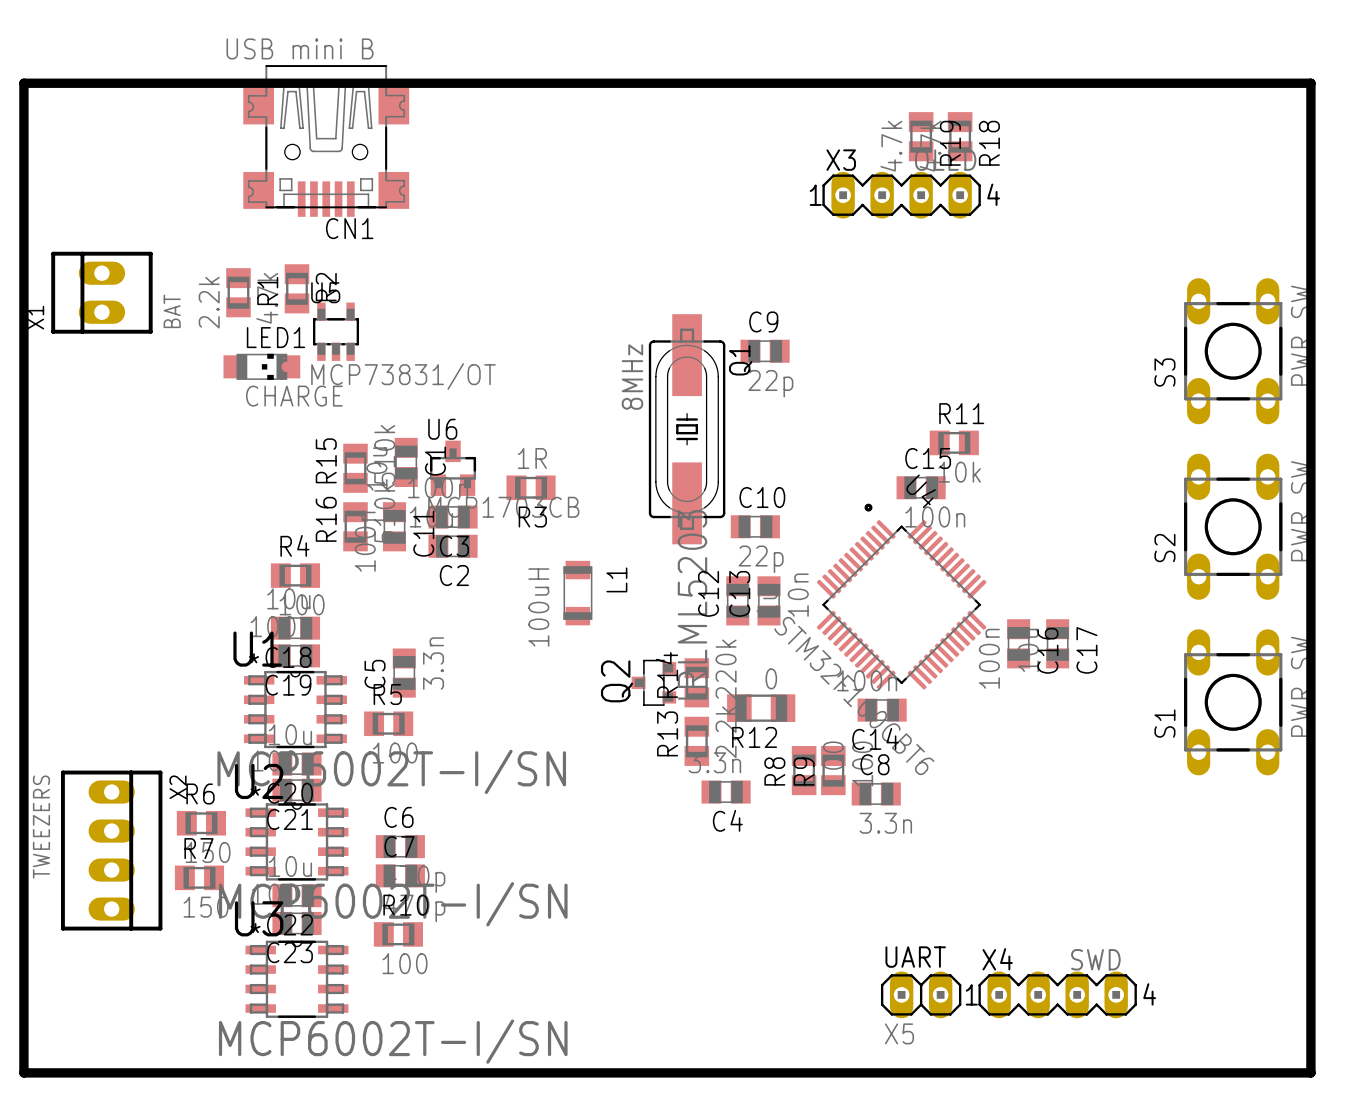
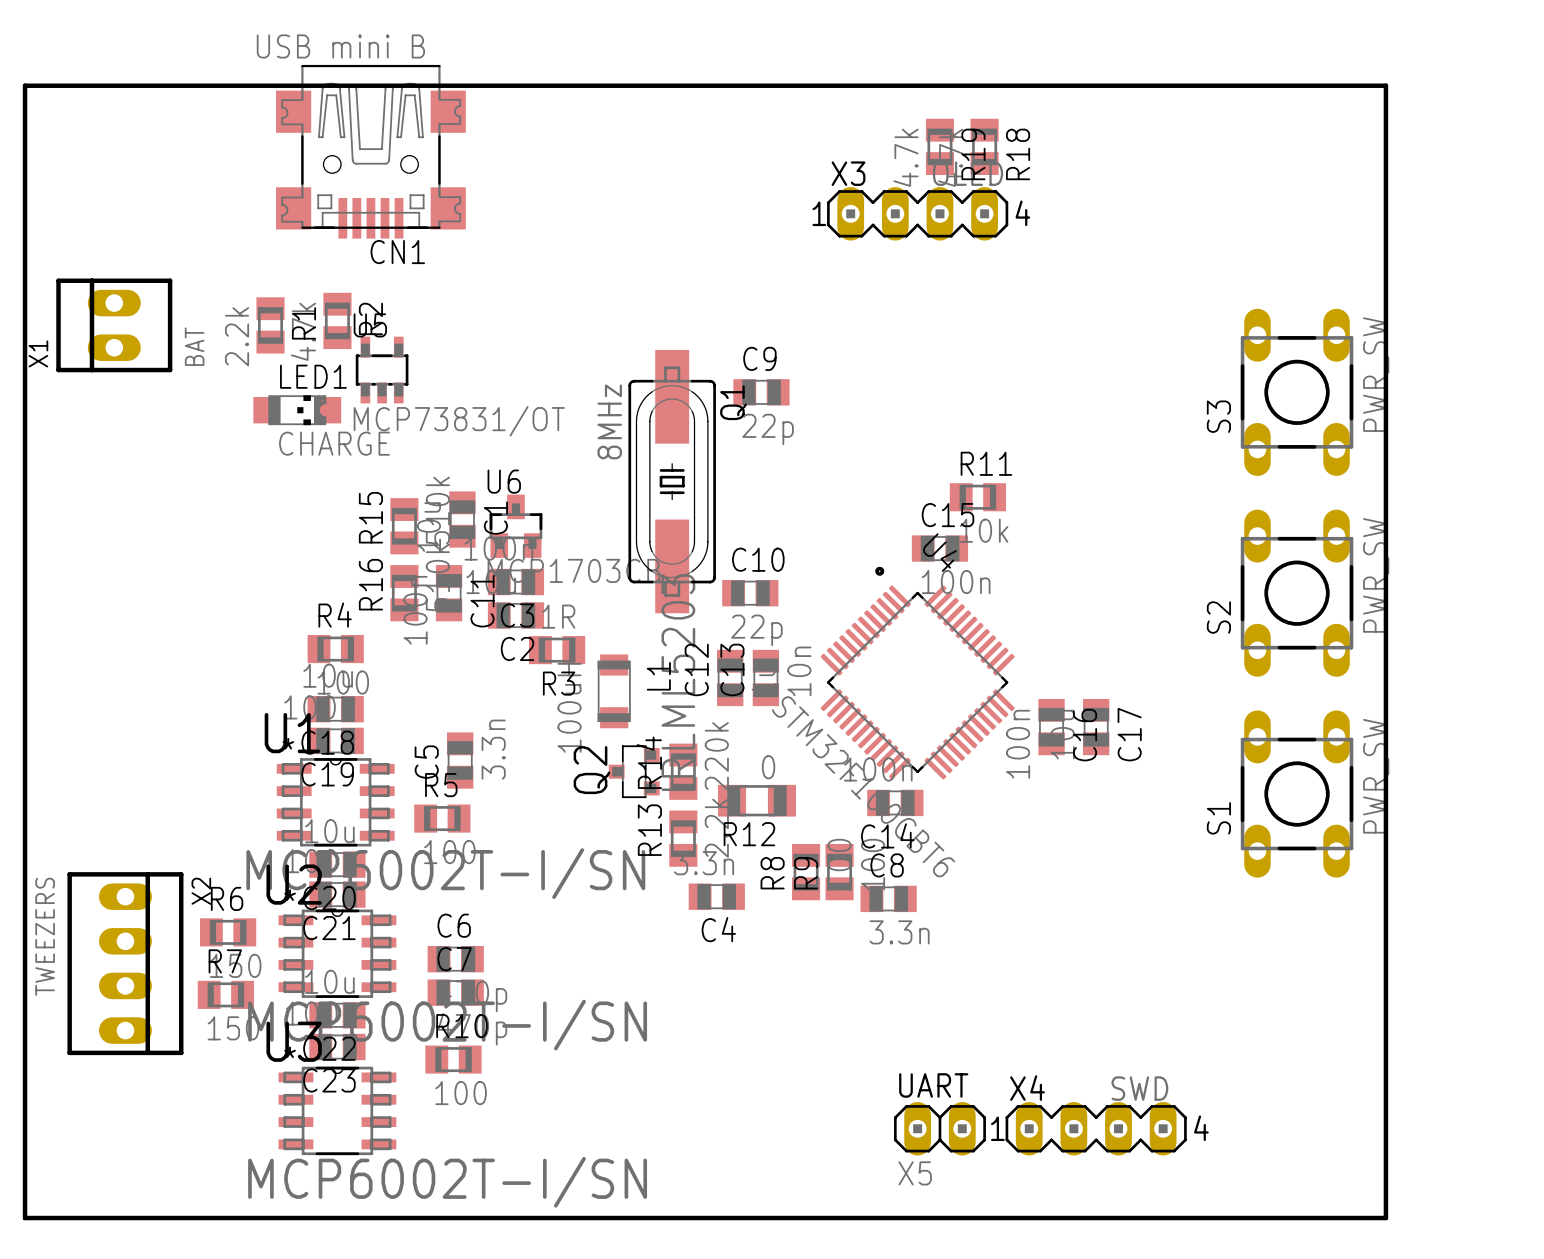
board edge: (1213, 83) (1310, 83) (1310, 1072) (1213, 1072) -> (1385, 85) (1385, 1218)
board edge width: thick (1213, 83) (23, 83) (23, 1072) (1213, 1072) -> thin (1385, 85) (25, 85) (25, 1218) (1385, 1218)
R19 position: (921, 136) -> (939, 146)
R18 position: (960, 136) -> (984, 146)
X3 position: (901, 195) -> (917, 213)
C9 position: (765, 351) -> (761, 392)
S3 position: (1233, 351) -> (1297, 392)
Q1 position: (687, 429) -> (672, 481)
R11 position: (954, 442) -> (977, 497)
R3 position: (531, 487) -> (557, 650)
C15 position: (921, 487) -> (939, 548)
C10 position: (755, 526) -> (750, 593)
S2 position: (1233, 526) -> (1297, 593)
L1 position: (577, 593) -> (614, 691)
U4 position: (901, 596) -> (917, 673)
C12 position: (737, 600) -> (730, 677)
C13 position: (769, 600) -> (765, 677)
C16 position: (1018, 643) -> (1051, 727)
C17 position: (1057, 643) -> (1096, 727)
Q2 position: (653, 682) -> (634, 771)
R14 position: (696, 682) -> (683, 771)
S1 position: (1233, 702) -> (1297, 794)
R12 position: (761, 708) -> (756, 800)
C14 position: (882, 710) -> (895, 802)
R13 position: (696, 741) -> (683, 838)
R8 position: (804, 770) -> (806, 872)
R9 position: (833, 770) -> (839, 872)
C4 position: (726, 792) -> (716, 896)
C8 position: (876, 793) -> (888, 898)
UART position: (921, 994) -> (939, 1128)
X4 position: (1057, 994) -> (1096, 1128)

